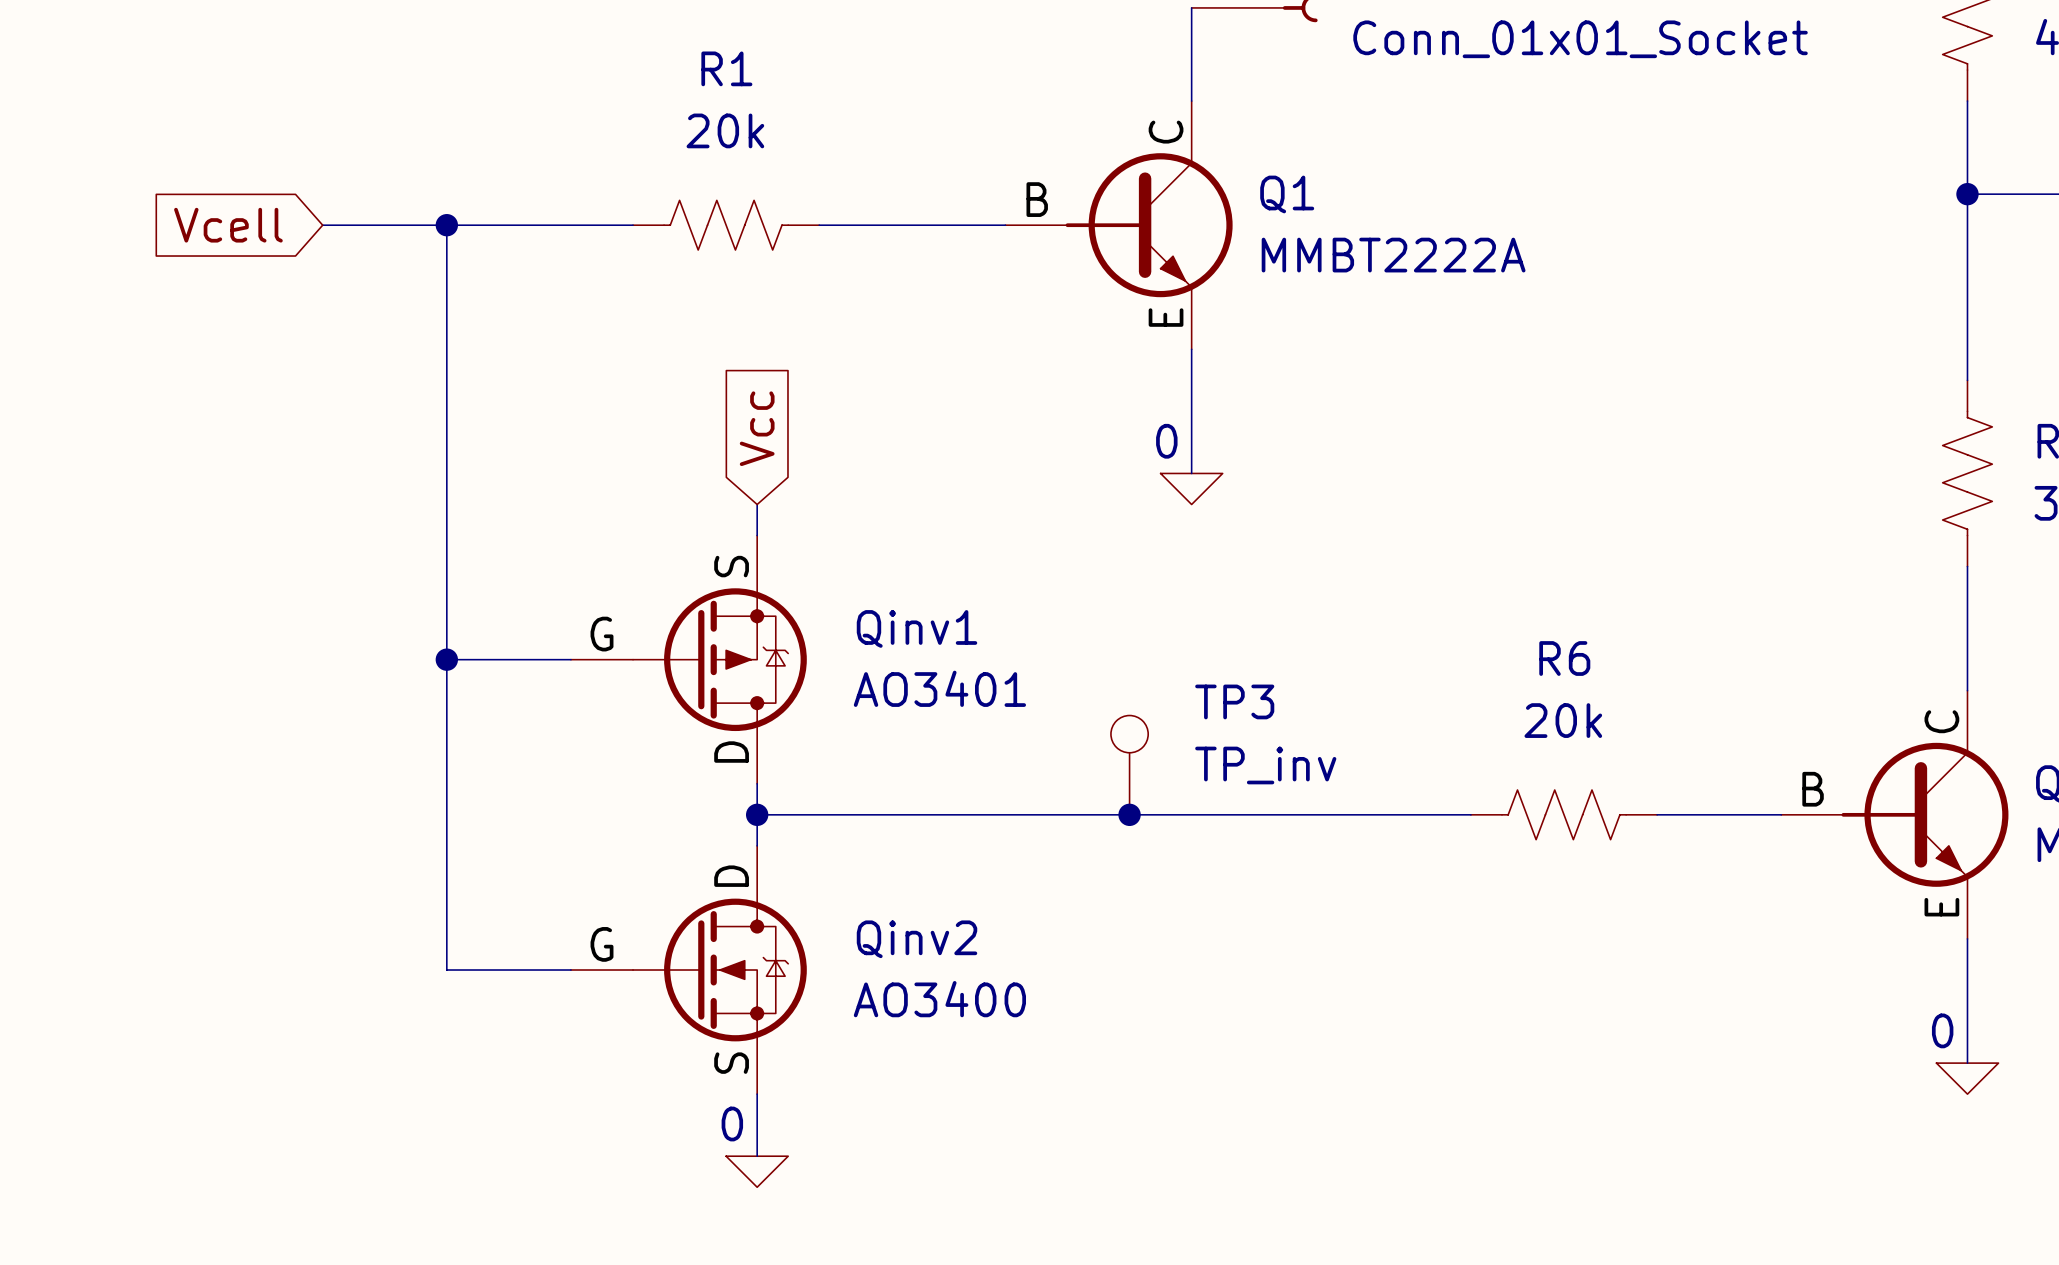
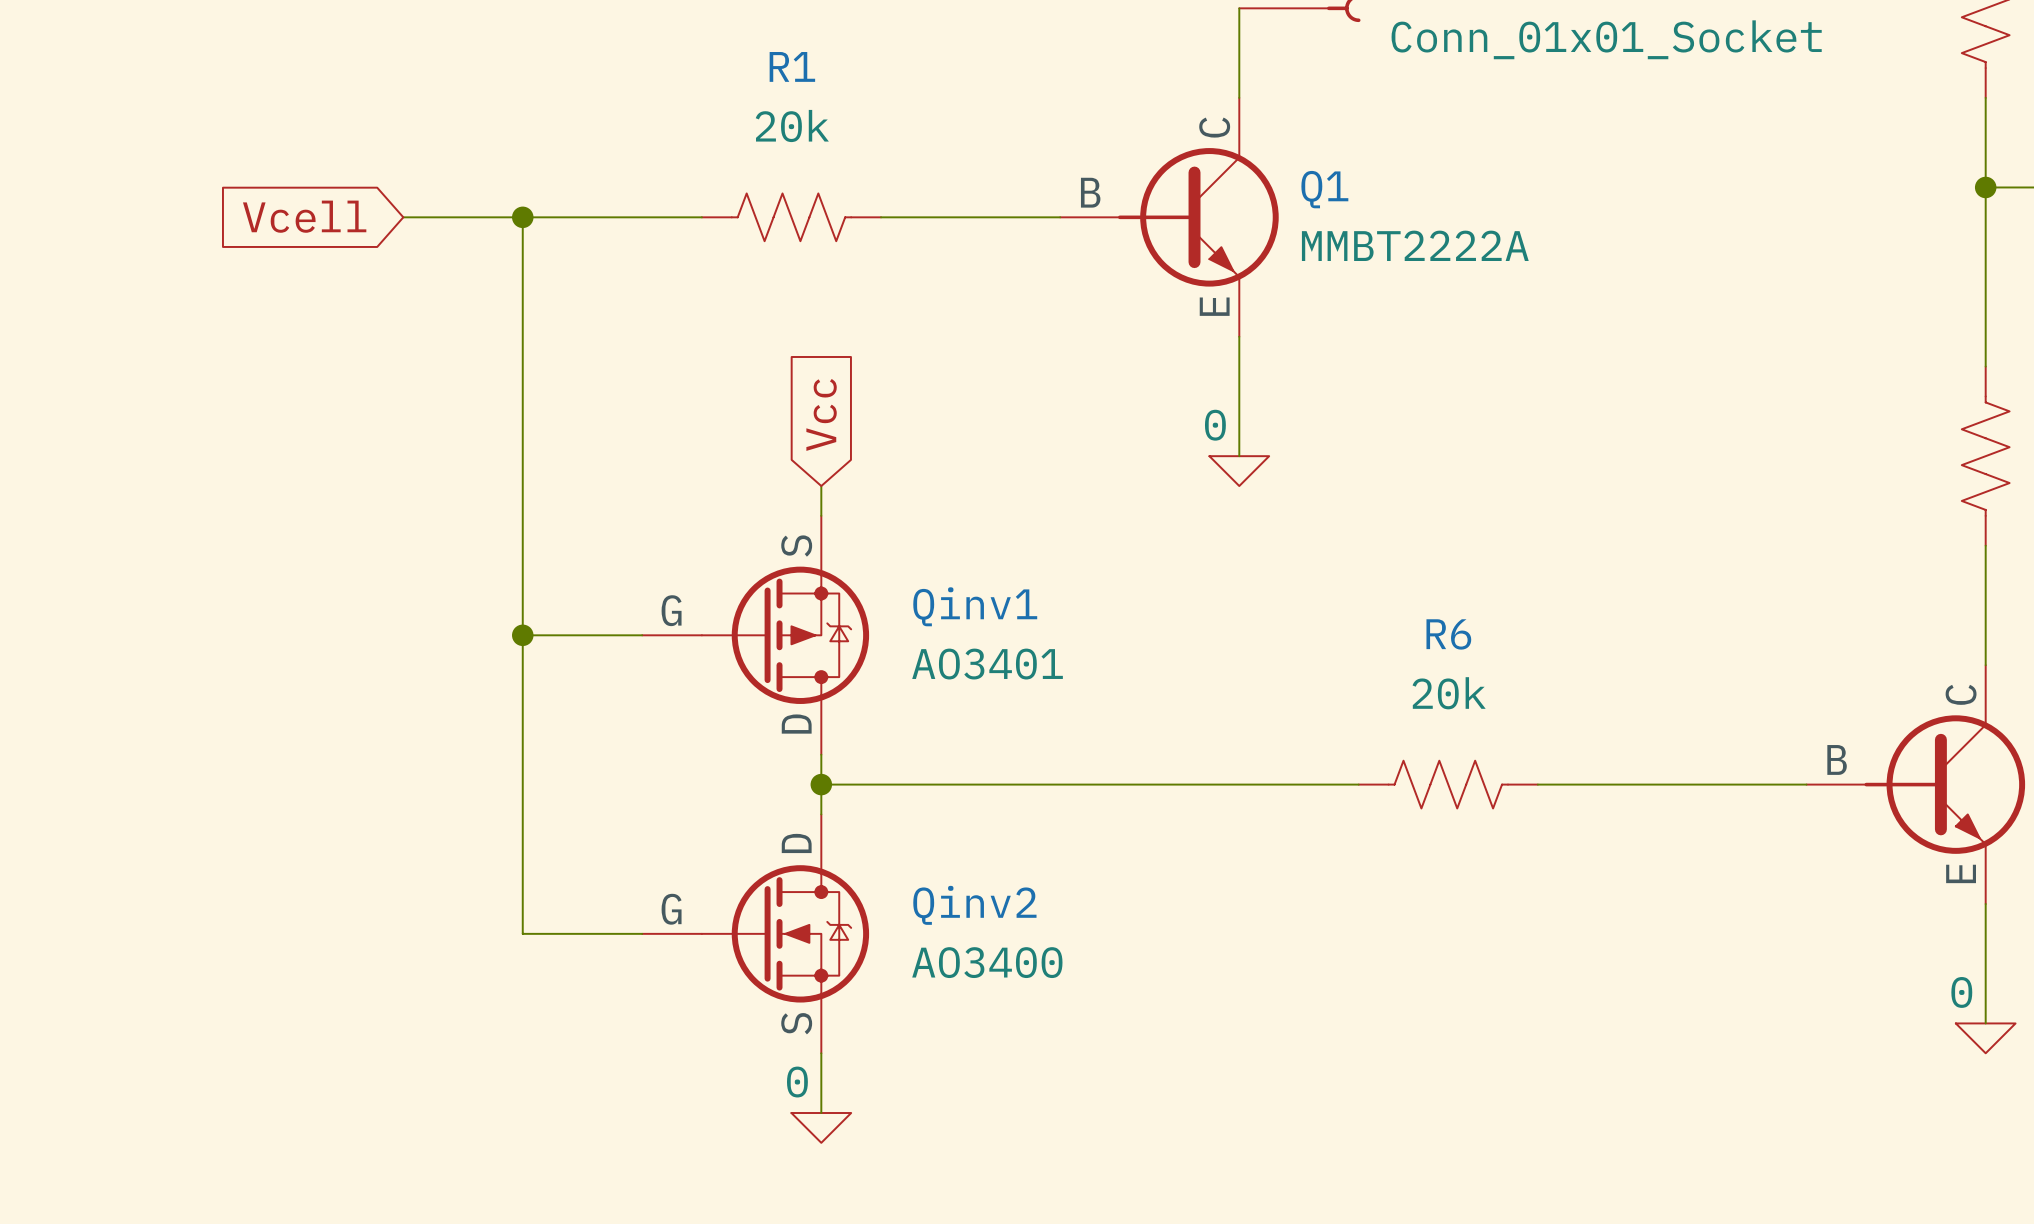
TP3: TP_inv (1129, 765) -> none
junction: (1129, 814) -> none
wire: (1315, 814) (1470, 814) -> (1537, 784) (1687, 784)
R6 position: (1564, 814) -> (1448, 784)

